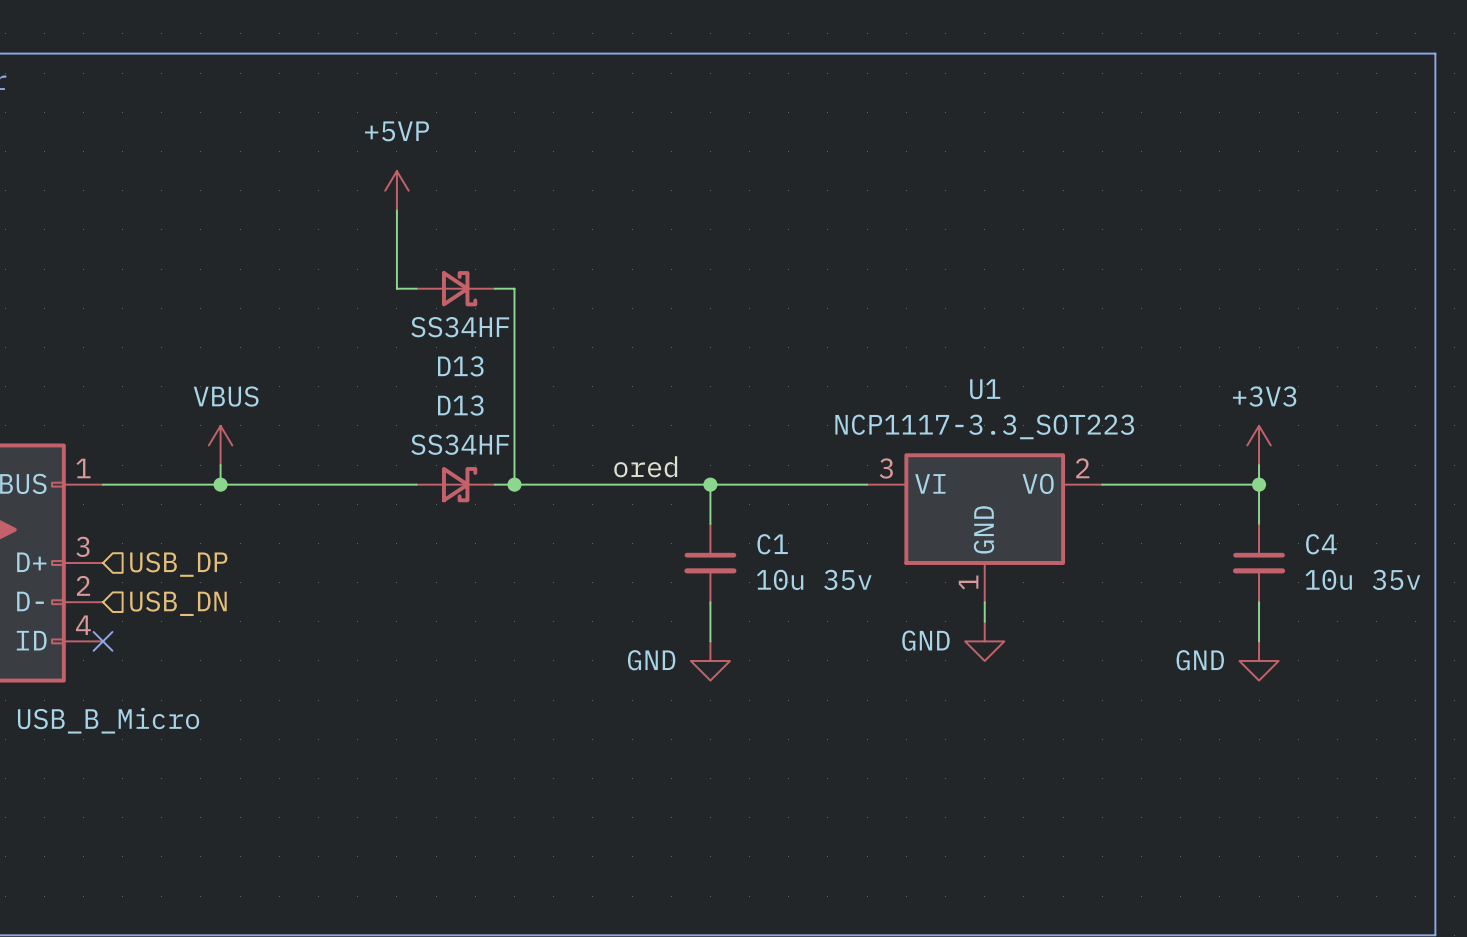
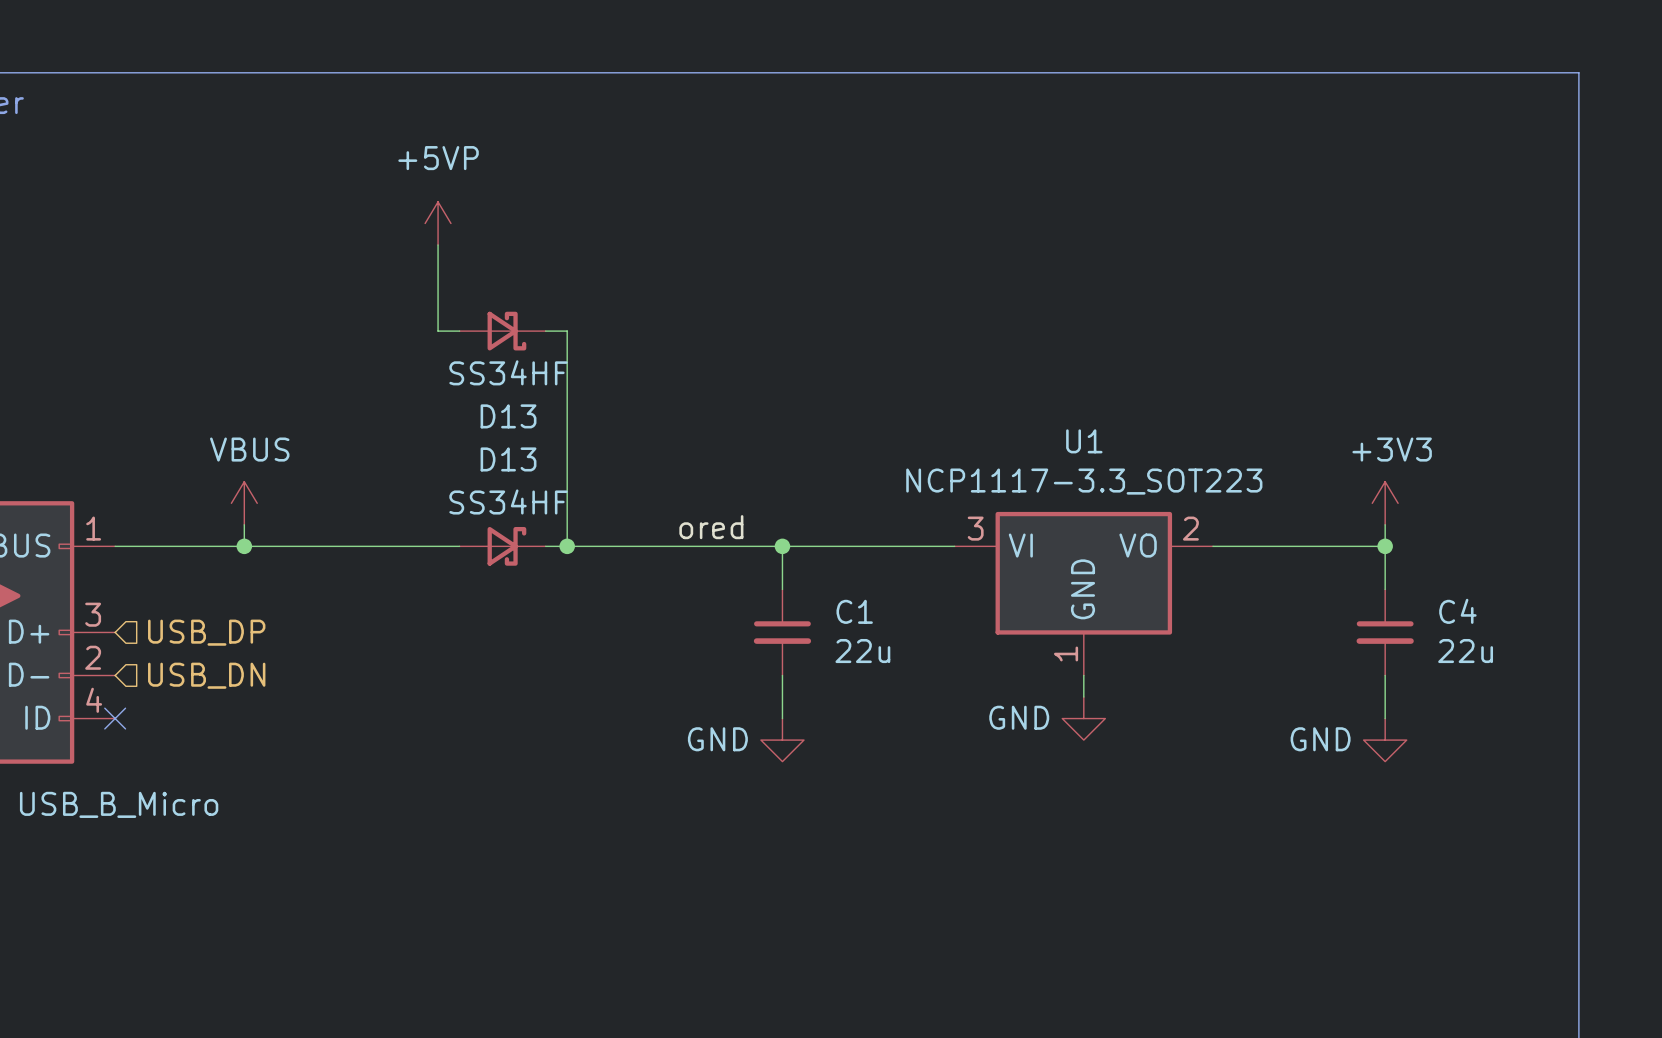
C1 value: 10u 35v (814, 579) -> 22u (862, 651)
C4 value: 10u 35v (1362, 579) -> 22u (1465, 651)

